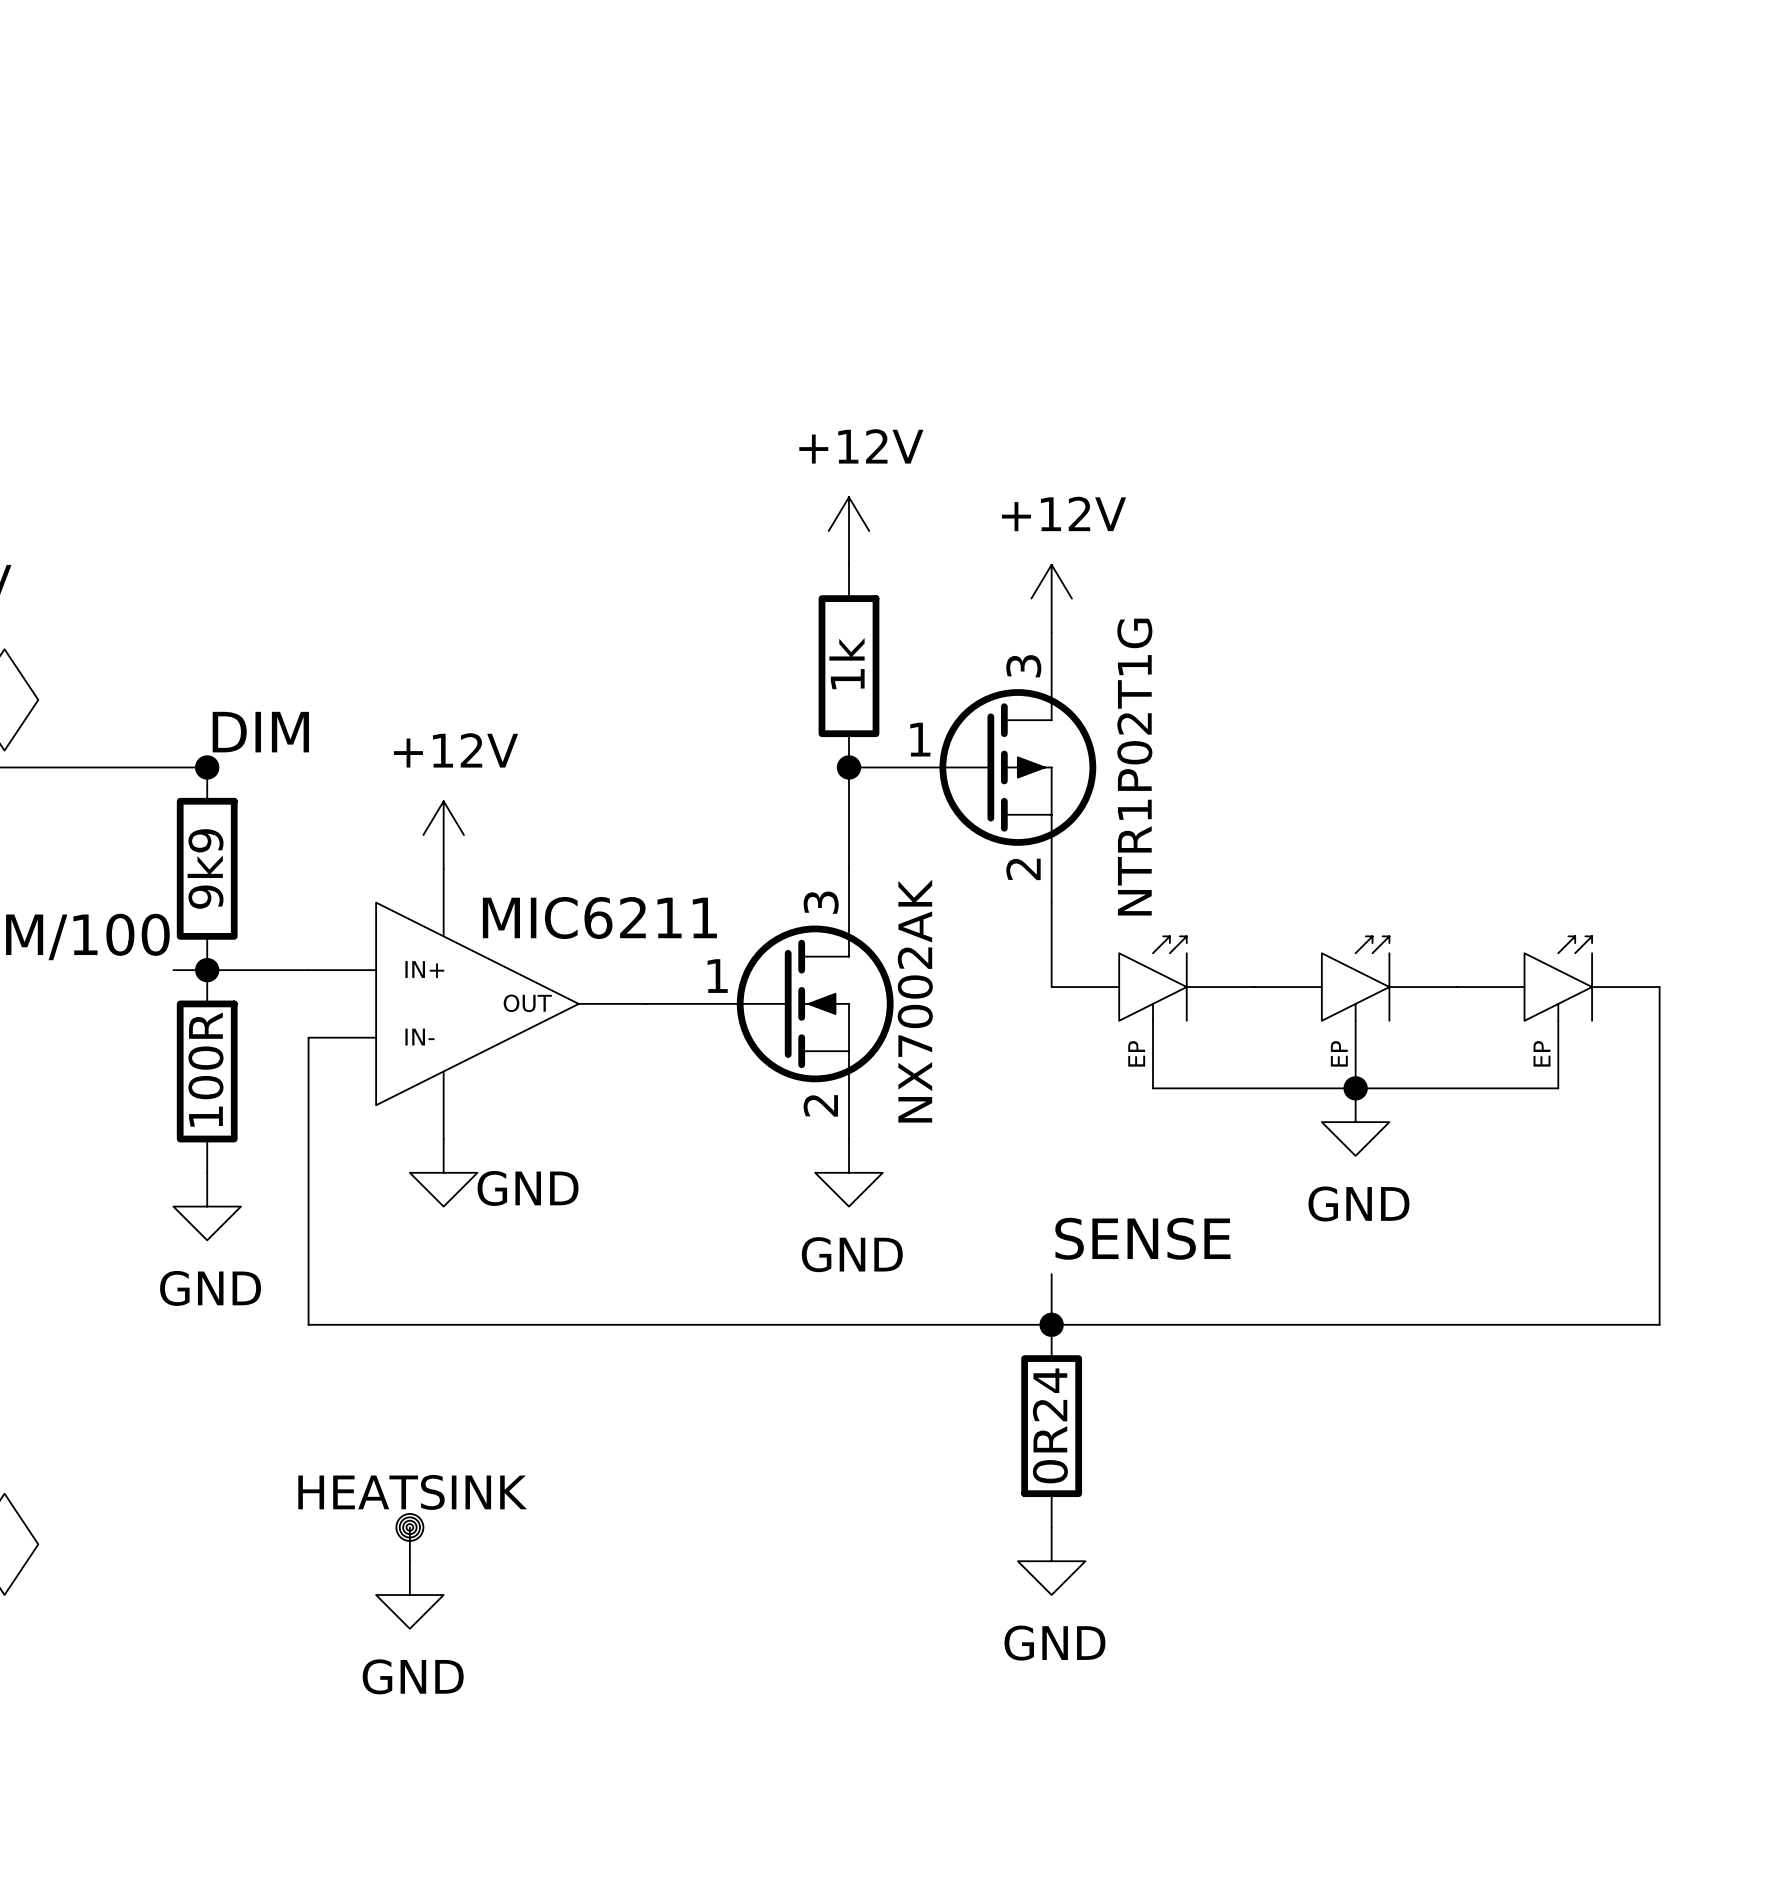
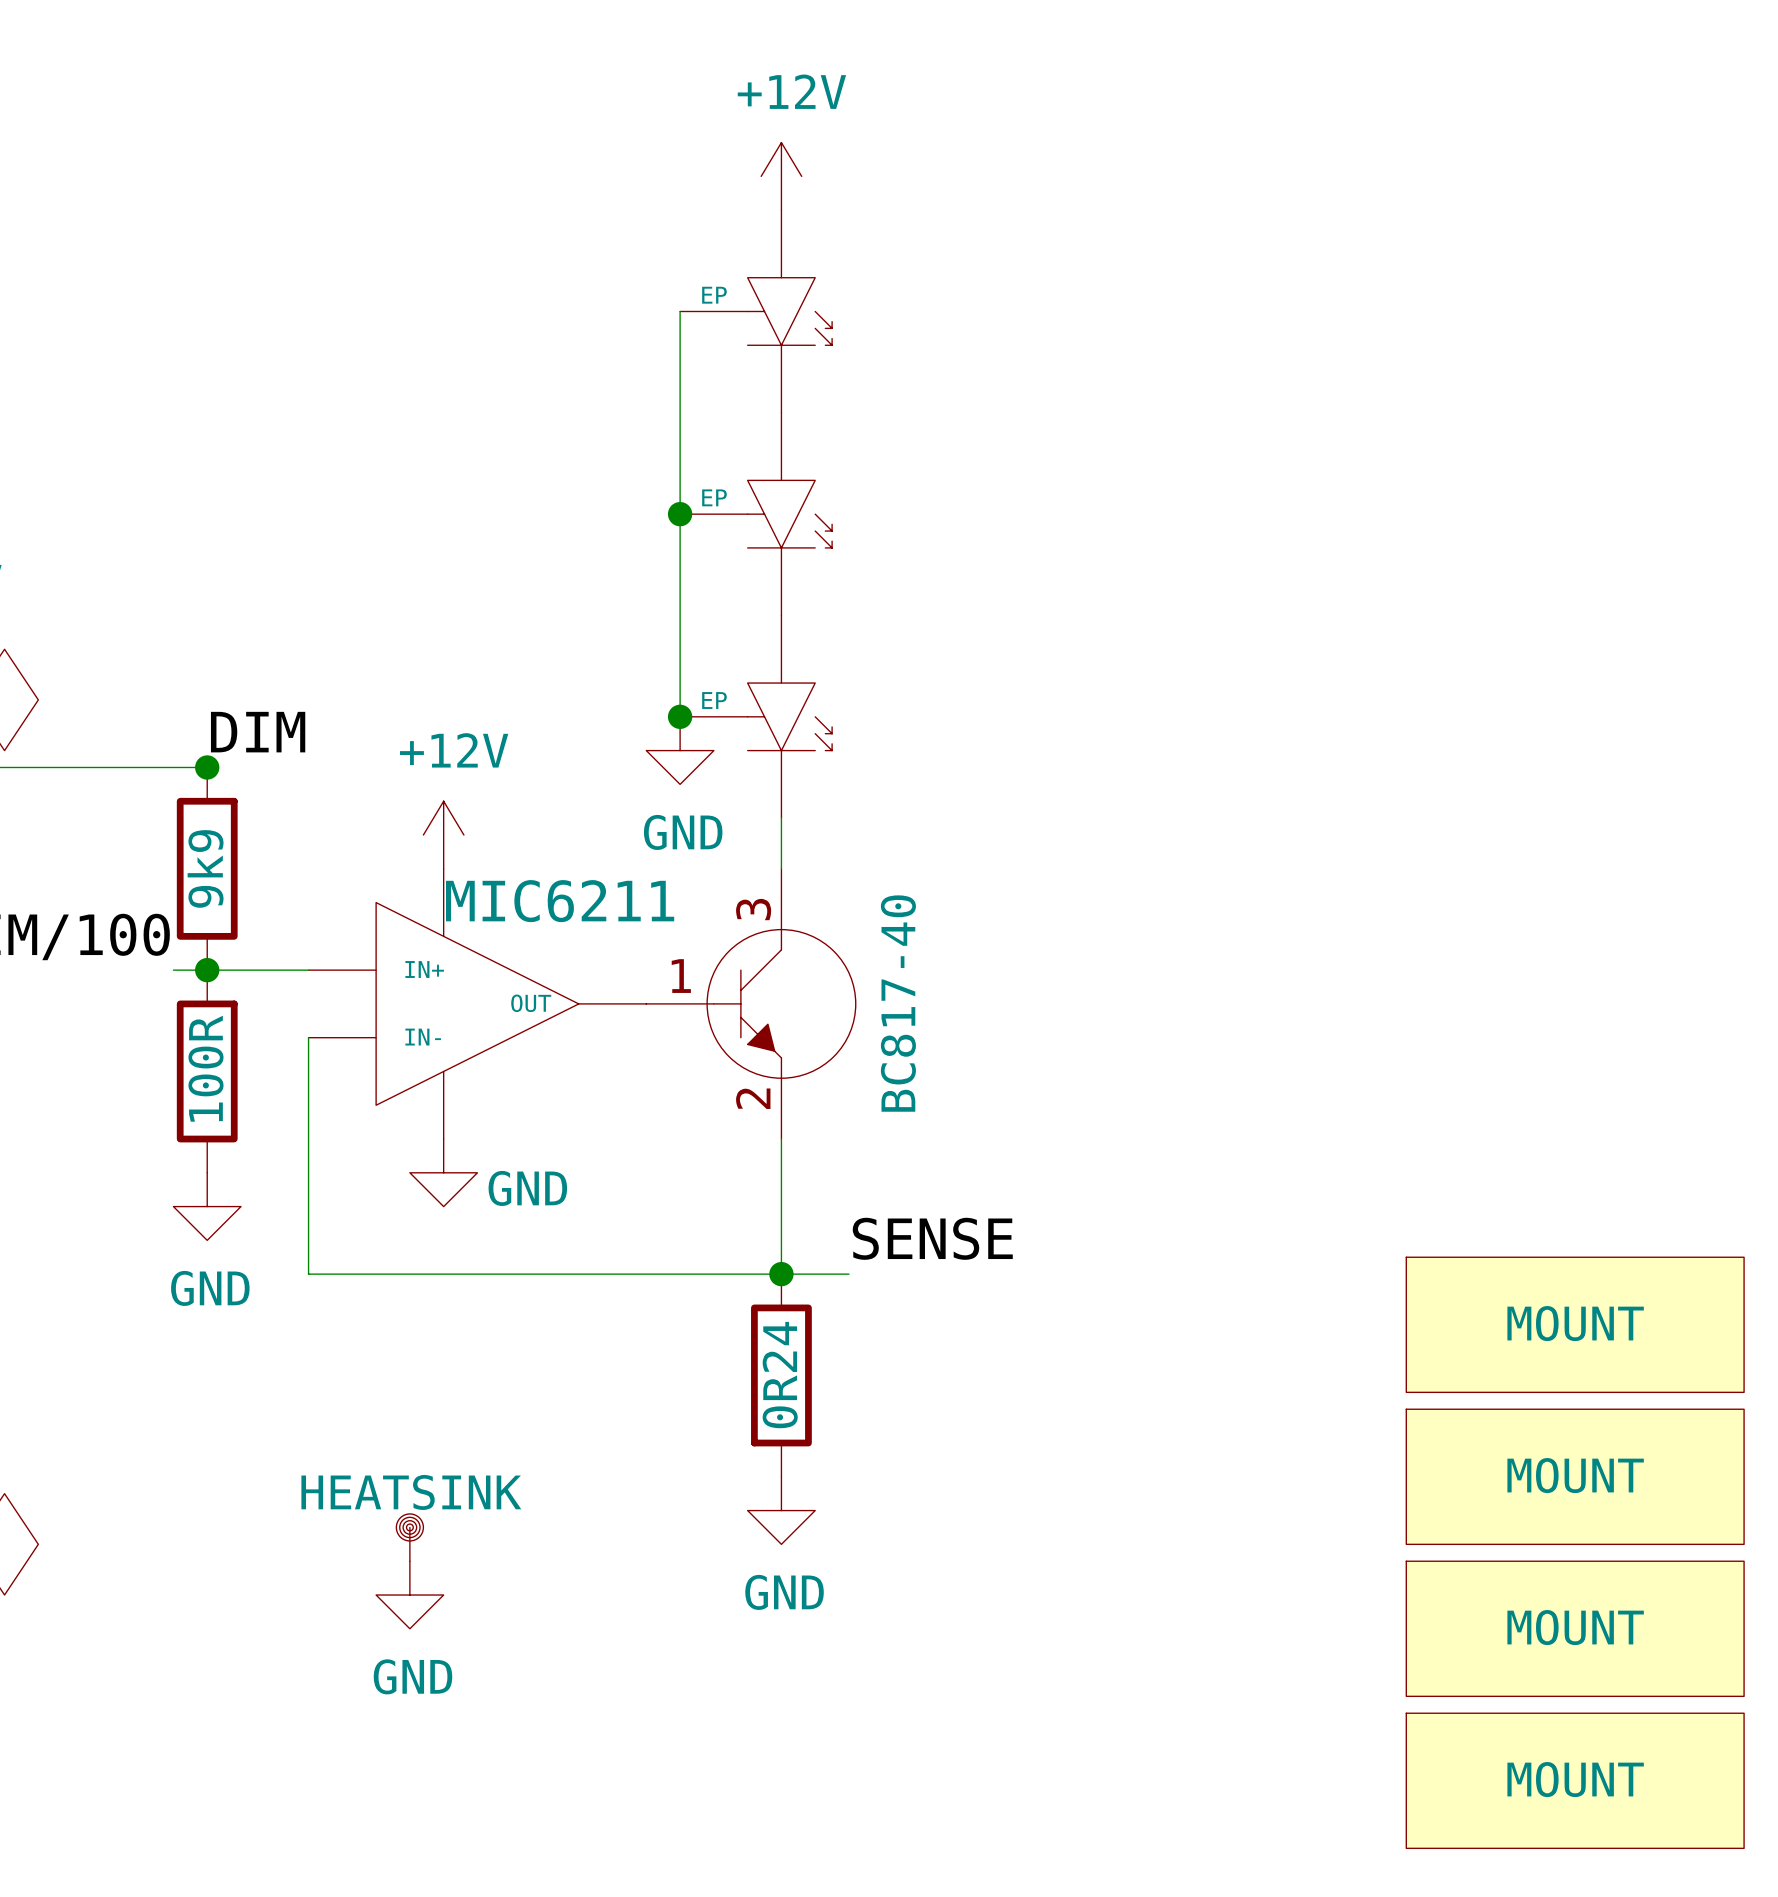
power symbol: none -> +12V (781, 176)
wire: none -> (680, 311) (680, 716)
part: none -> (756, 311)
junction: none -> (680, 514)
part: none -> (756, 514)
power symbol: +12V (848, 531) -> none
power symbol: +12V (1051, 598) -> none
part: 1k (848, 666) -> none
junction: none -> (680, 716)
part: none -> (756, 716)
power symbol: none -> GND (680, 750)
wire: (848, 767) (848, 868) -> none
junction: (848, 767) -> none
part: NTR1P02T1G (972, 767) -> none
part symbol: [646, 868, 894, 1140] -> [646, 868, 856, 1140]
wire: (1051, 902) (1051, 987) -> none
part value position: MIC6211 (599, 917) -> MIC6211 (560, 901)
wire: (1659, 987) (1659, 1324) (308, 1324) (308, 1274) -> (848, 1274) (308, 1274)
part value: NX7002AK (915, 1001) -> BC817-40 (898, 1003)
part: (1152, 1012) -> none
part: (1355, 1012) -> none
part: (1558, 1012) -> none
wire: (1152, 1088) (1558, 1088) -> none
junction: (1355, 1088) -> none
power symbol: GND (1355, 1122) -> none
wire: none -> (781, 1139) (781, 1274)
power symbol: GND (848, 1172) -> none
label position: SENSE (1142, 1238) -> SENSE (932, 1238)
junction: none -> (781, 1274)
wire: (1051, 1274) (1051, 1324) -> (781, 818) (781, 868)
junction: (1051, 1324) -> none
part: none -> MOUNT (1575, 1324)
part position: (1051, 1426) -> (781, 1375)
part: none -> MOUNT (1575, 1476)
power symbol: none -> GND (781, 1510)
power symbol: GND (1051, 1561) -> none
part: none -> MOUNT (1575, 1628)
part: none -> MOUNT (1575, 1780)

